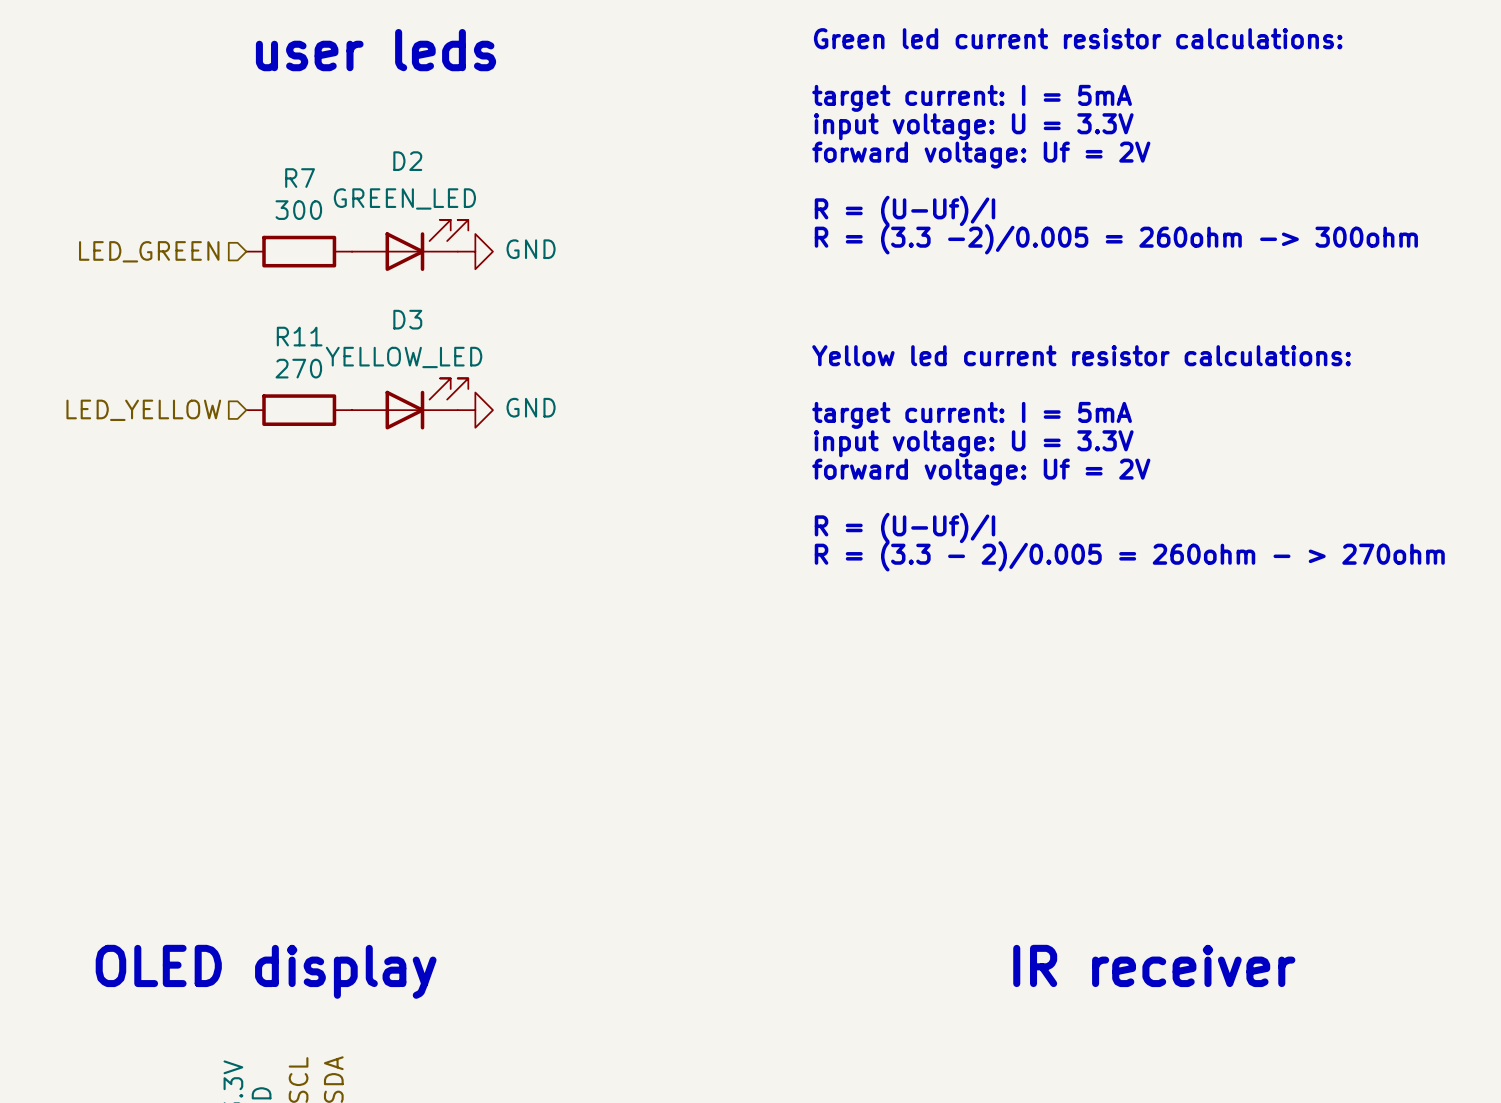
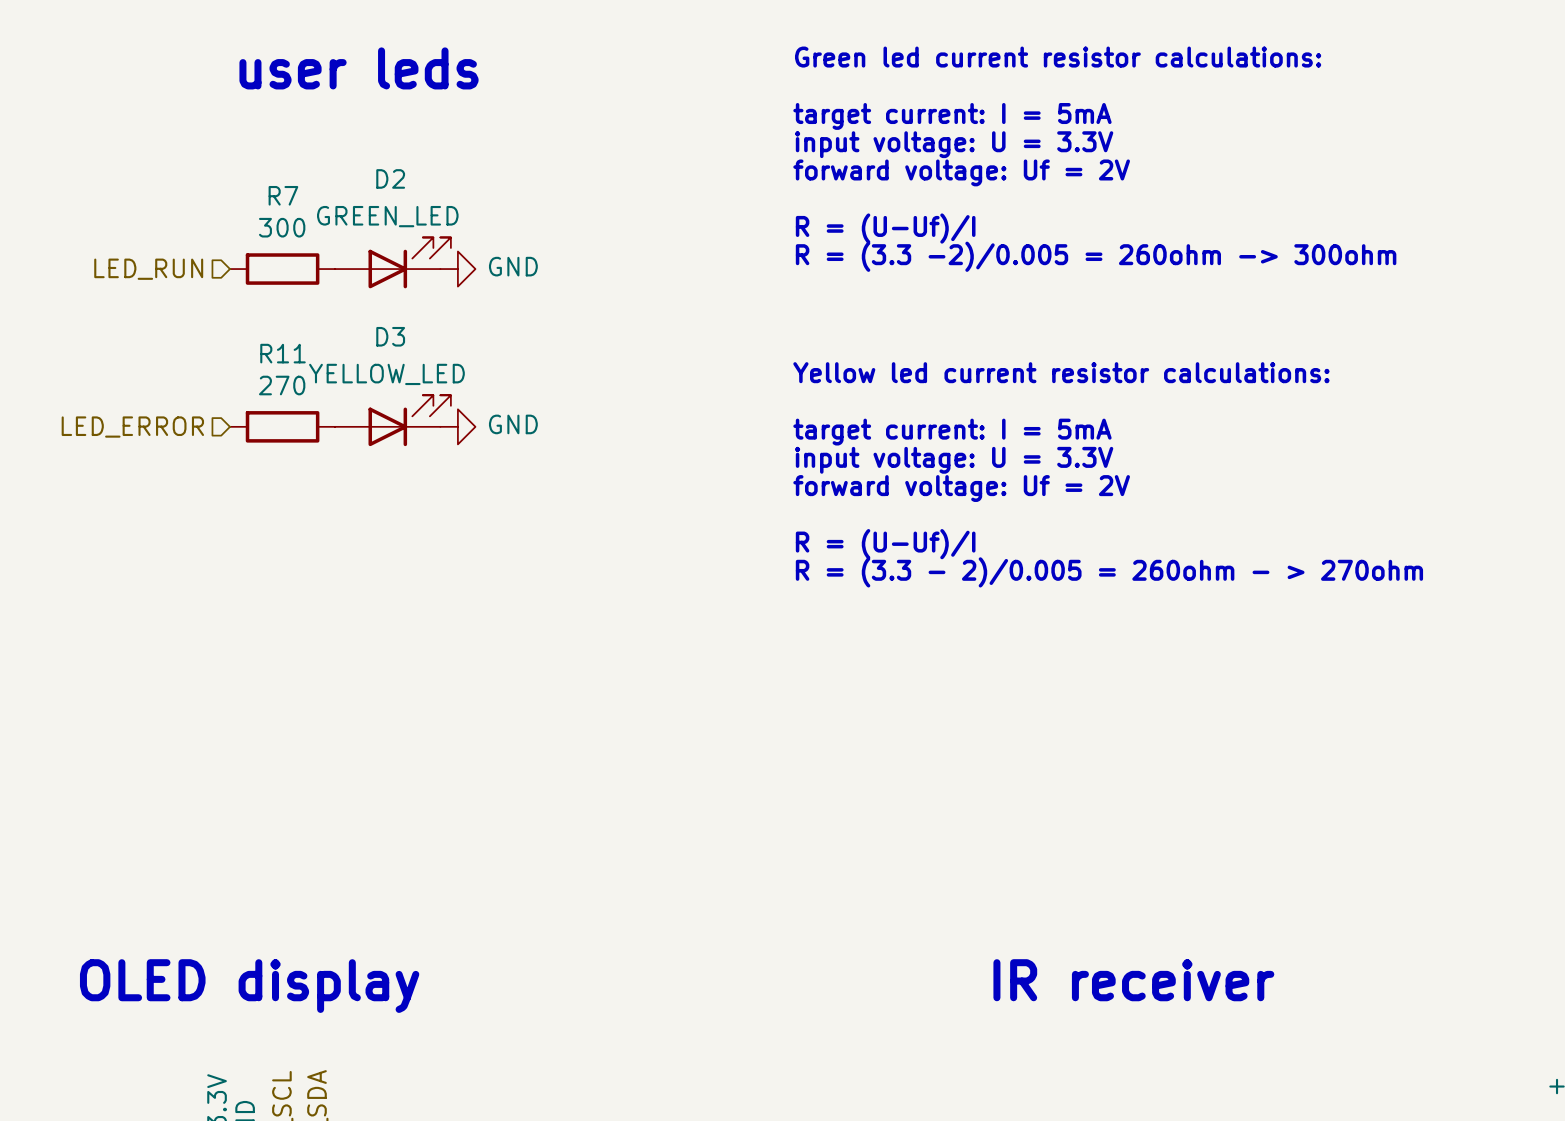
hierarchical label: LED_GREEN (149, 251) -> LED_RUN (148, 269)
hierarchical label: LED_YELLOW (143, 410) -> LED_ERROR (132, 427)

